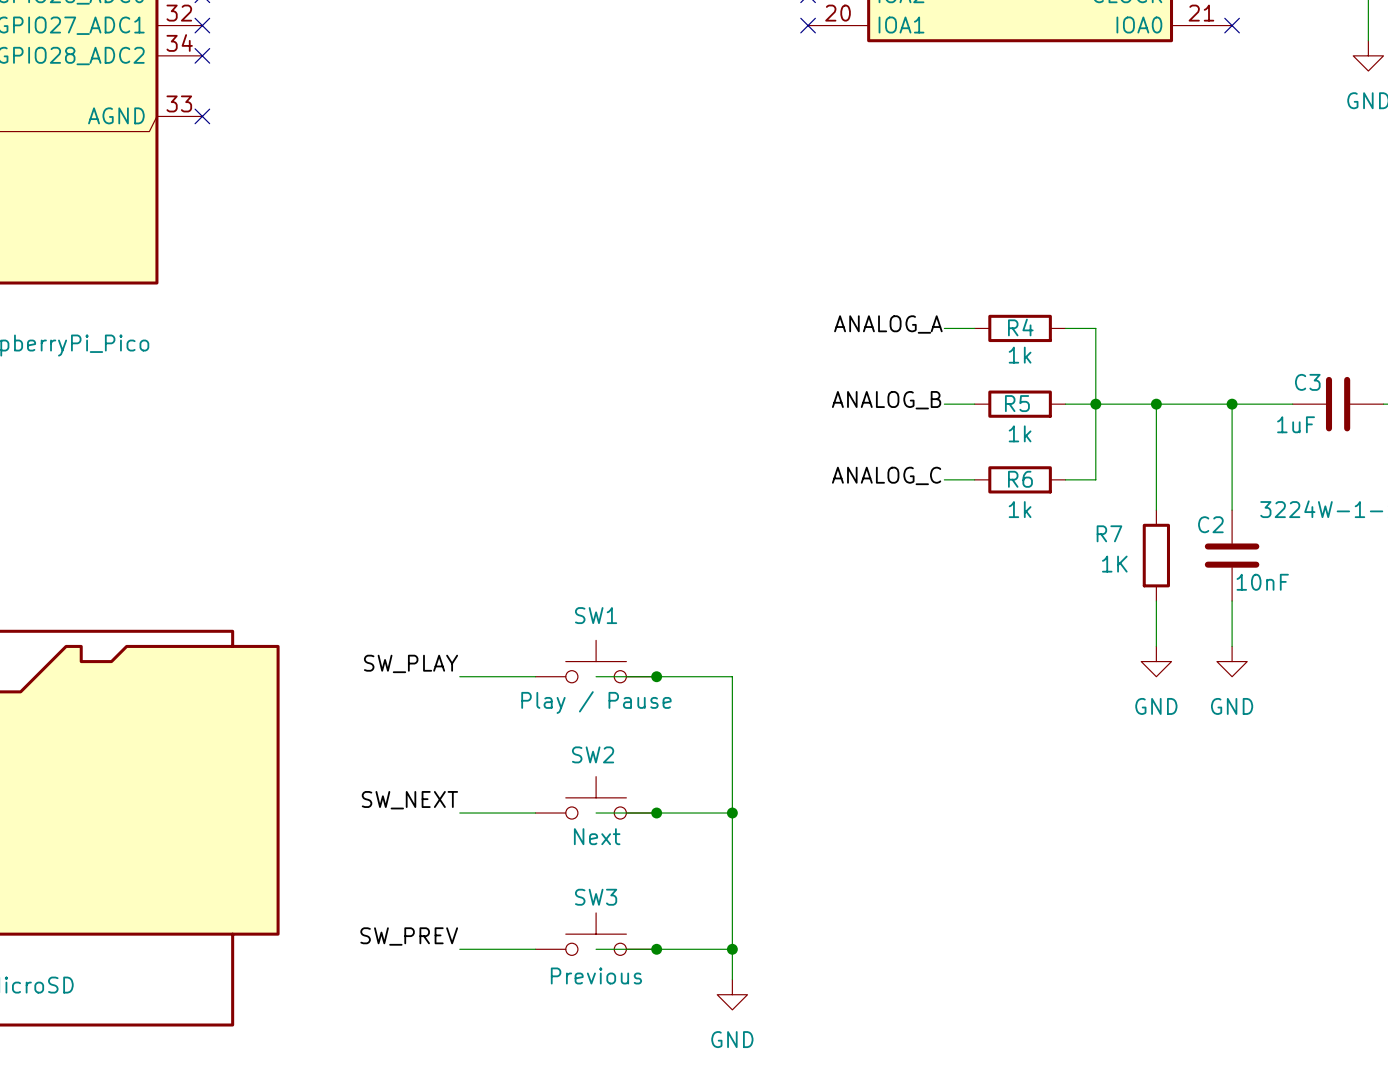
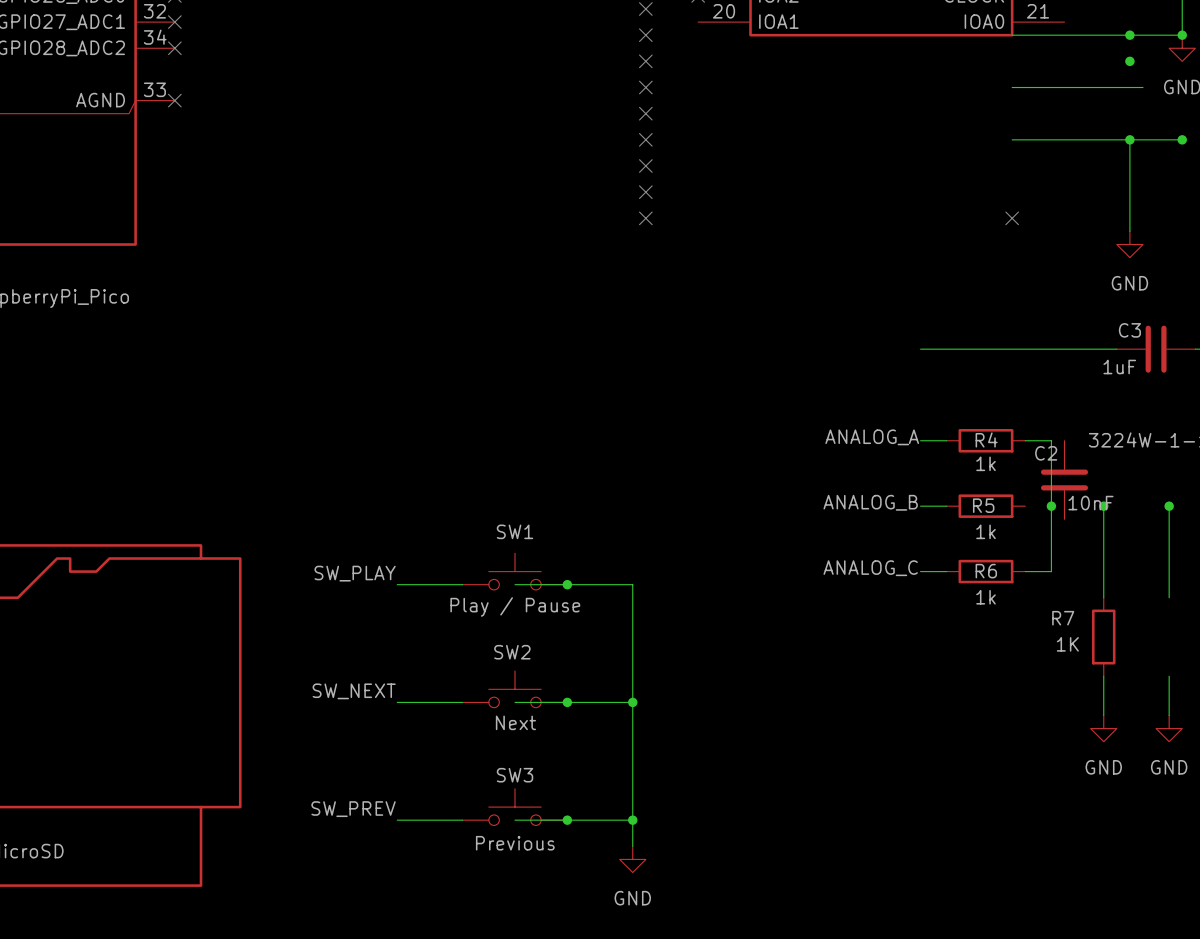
no-connect mark: none -> (645, 9)
no-connect mark: (808, 25) -> none
no-connect mark: (1232, 25) -> none
no-connect mark: none -> (645, 35)
wire: none -> (1012, 35) (1182, 35)
junction: none -> (1129, 35)
junction: none -> (1182, 35)
no-connect mark: none -> (645, 61)
junction: none -> (1129, 61)
no-connect mark: none -> (645, 87)
wire: none -> (1012, 87) (1142, 87)
no-connect mark: none -> (645, 113)
no-connect mark: none -> (645, 139)
wire: none -> (1012, 139) (1182, 139)
wire: none -> (1129, 139) (1129, 231)
junction: none -> (1129, 139)
junction: none -> (1182, 139)
no-connect mark: none -> (645, 166)
no-connect mark: none -> (645, 192)
no-connect mark: none -> (645, 218)
no-connect mark: none -> (1012, 218)
power symbol: none -> GND (1129, 244)
label position: ANALOG_A (888, 324) -> ANALOG_A (872, 437)
wire: (944, 328) (974, 328) -> (920, 440) (946, 440)
R4 position: (1020, 328) -> (986, 440)
wire: (1065, 328) (1095, 328) (1095, 479) (1065, 479) -> (1025, 440) (1051, 440) (1051, 571) (1025, 571)
label position: ANALOG_B (886, 400) -> ANALOG_B (870, 502)
wire: (944, 404) (974, 404) -> (920, 506) (946, 506)
R5 position: (1020, 404) -> (986, 506)
junction: (1095, 404) -> none
wire: (1156, 404) (1156, 510) -> (1103, 506) (1103, 597)
junction: (1156, 404) -> none
wire: (1232, 404) (1232, 510) -> (1169, 506) (1169, 597)
junction: (1232, 404) -> none
label position: ANALOG_C (886, 475) -> ANALOG_C (870, 568)
wire: (944, 479) (974, 479) -> (920, 571) (946, 571)
R6 position: (1020, 479) -> (986, 571)
R7 position: (1156, 555) -> (1103, 637)
junction: none -> (1051, 506)
junction: none -> (1103, 506)
junction: none -> (1169, 506)
wire: (1156, 601) (1156, 646) -> (1103, 676) (1103, 715)
wire: (1232, 601) (1232, 646) -> (1169, 676) (1169, 715)
power symbol: GND (1156, 661) -> none
power symbol: GND (1232, 661) -> none
power symbol: none -> GND (1103, 728)
power symbol: none -> GND (1169, 728)

